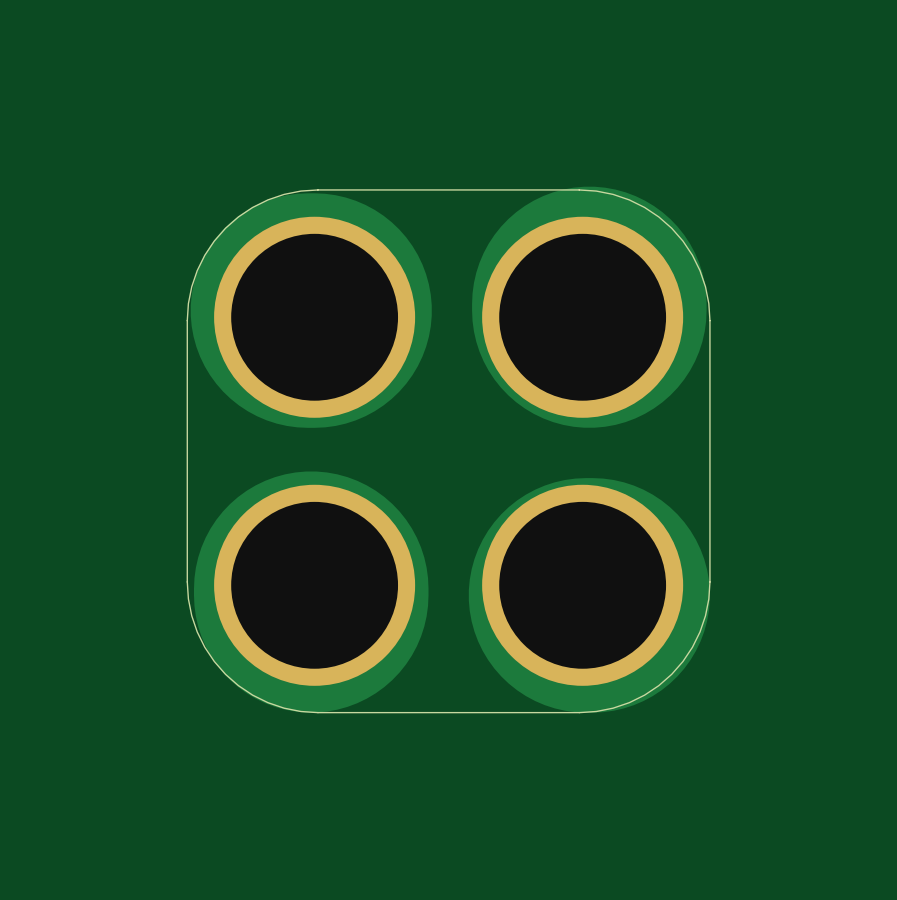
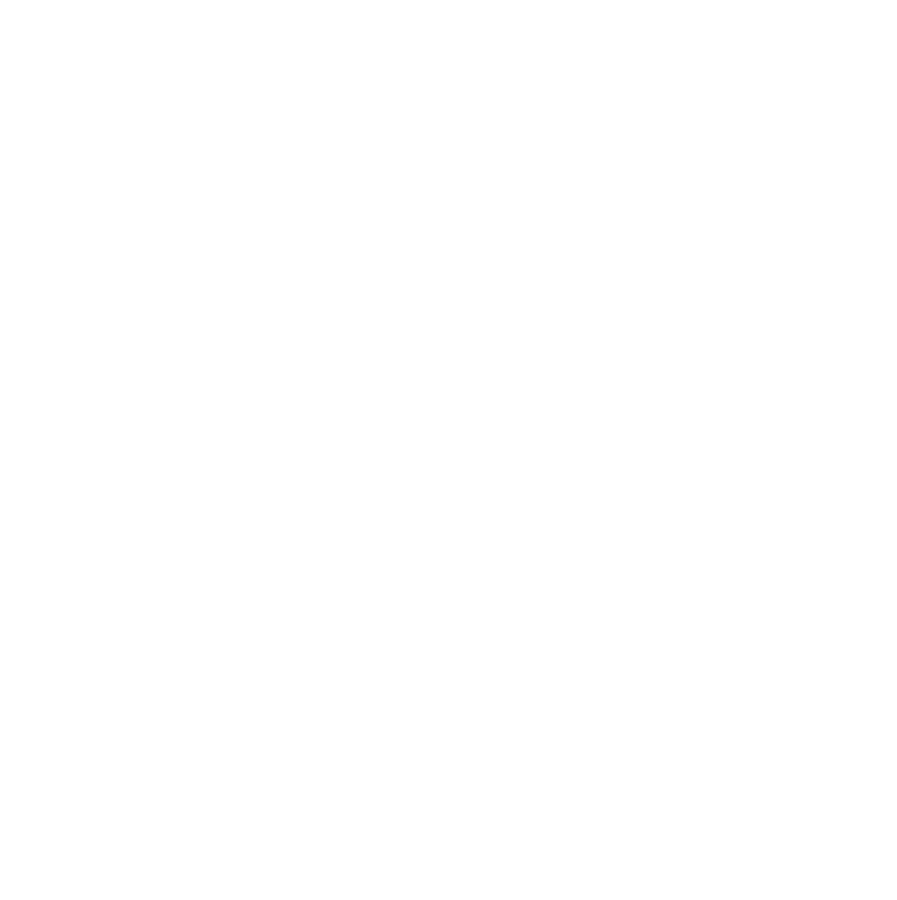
part: (448, 449) -> none

